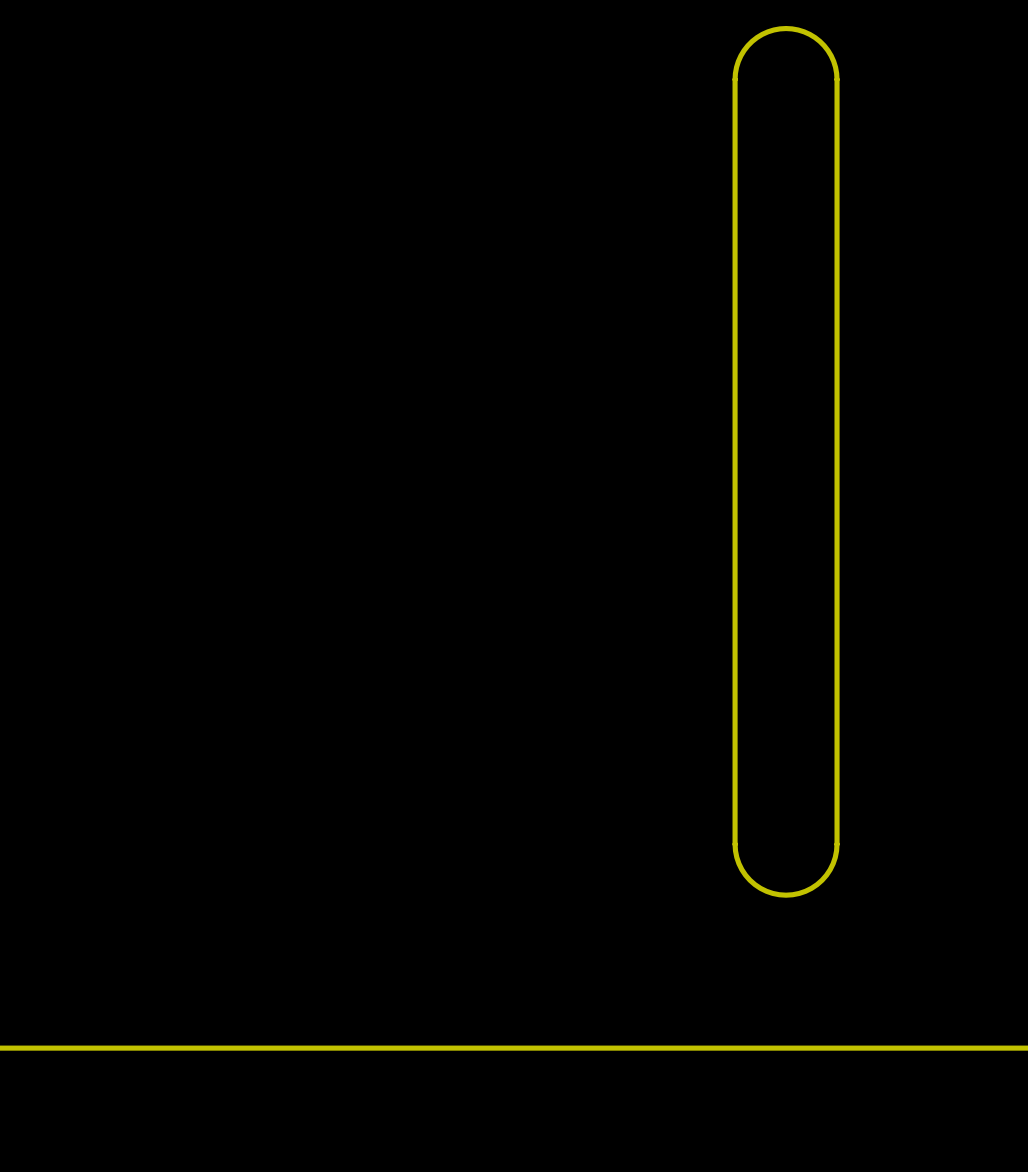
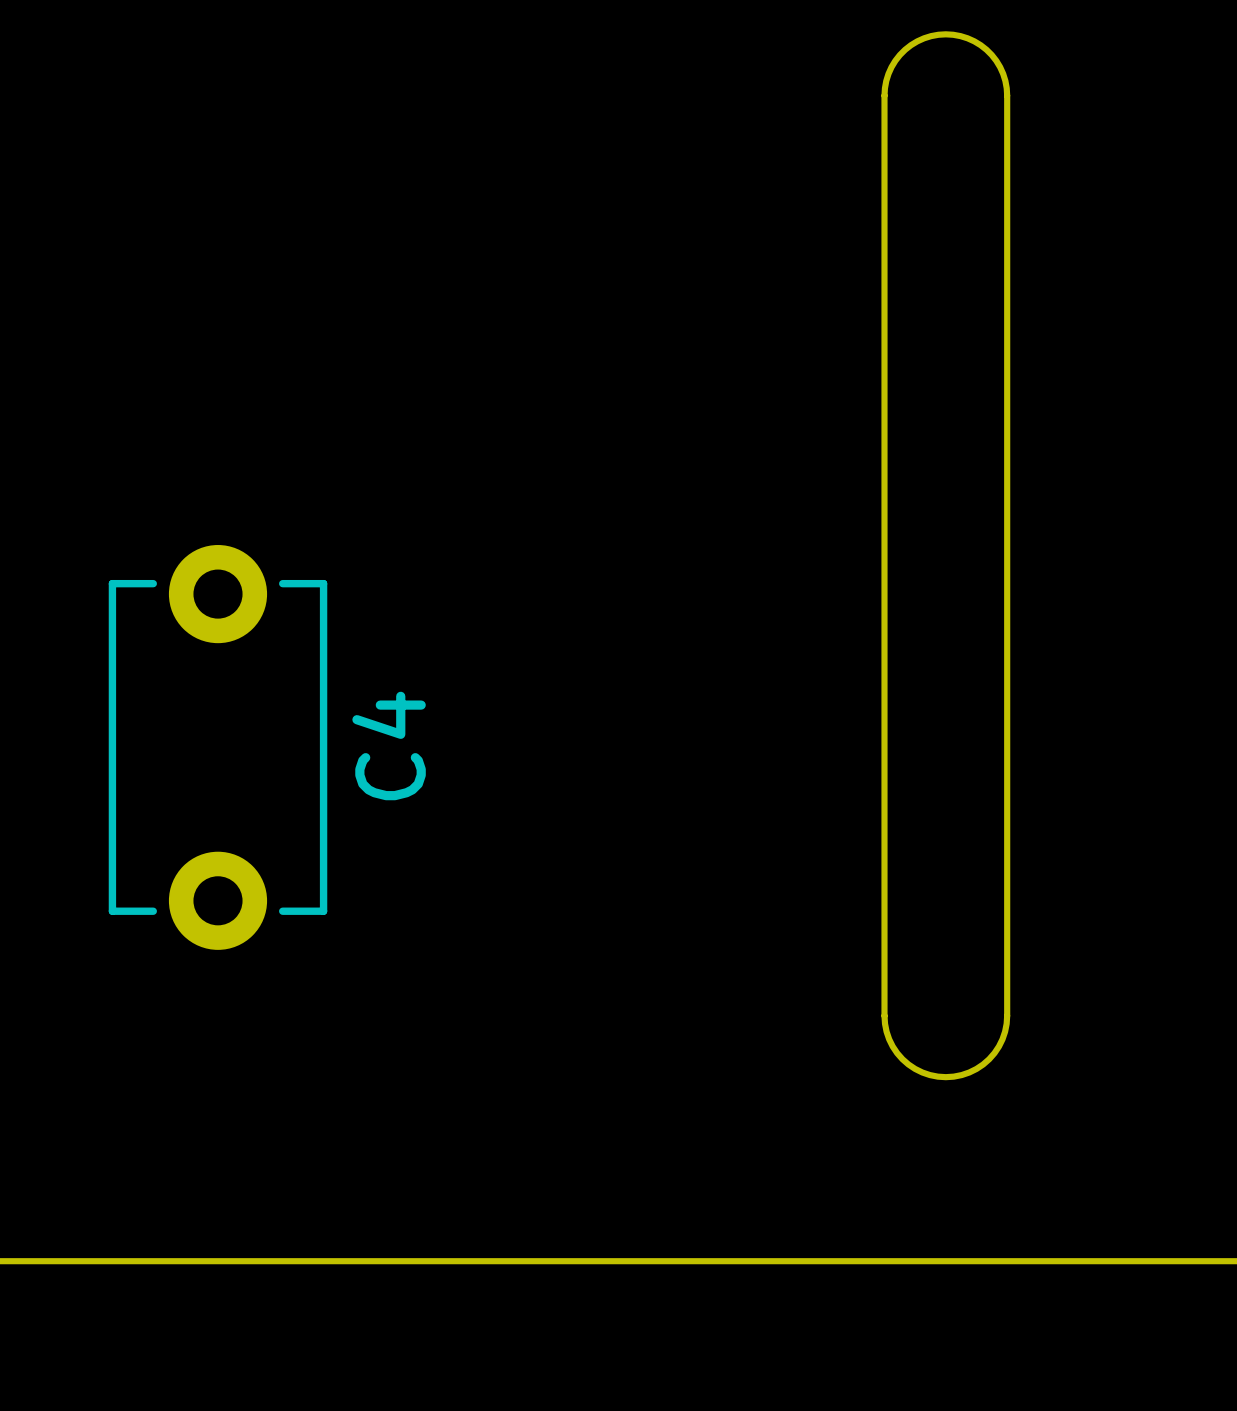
C4: none -> (218, 747)

